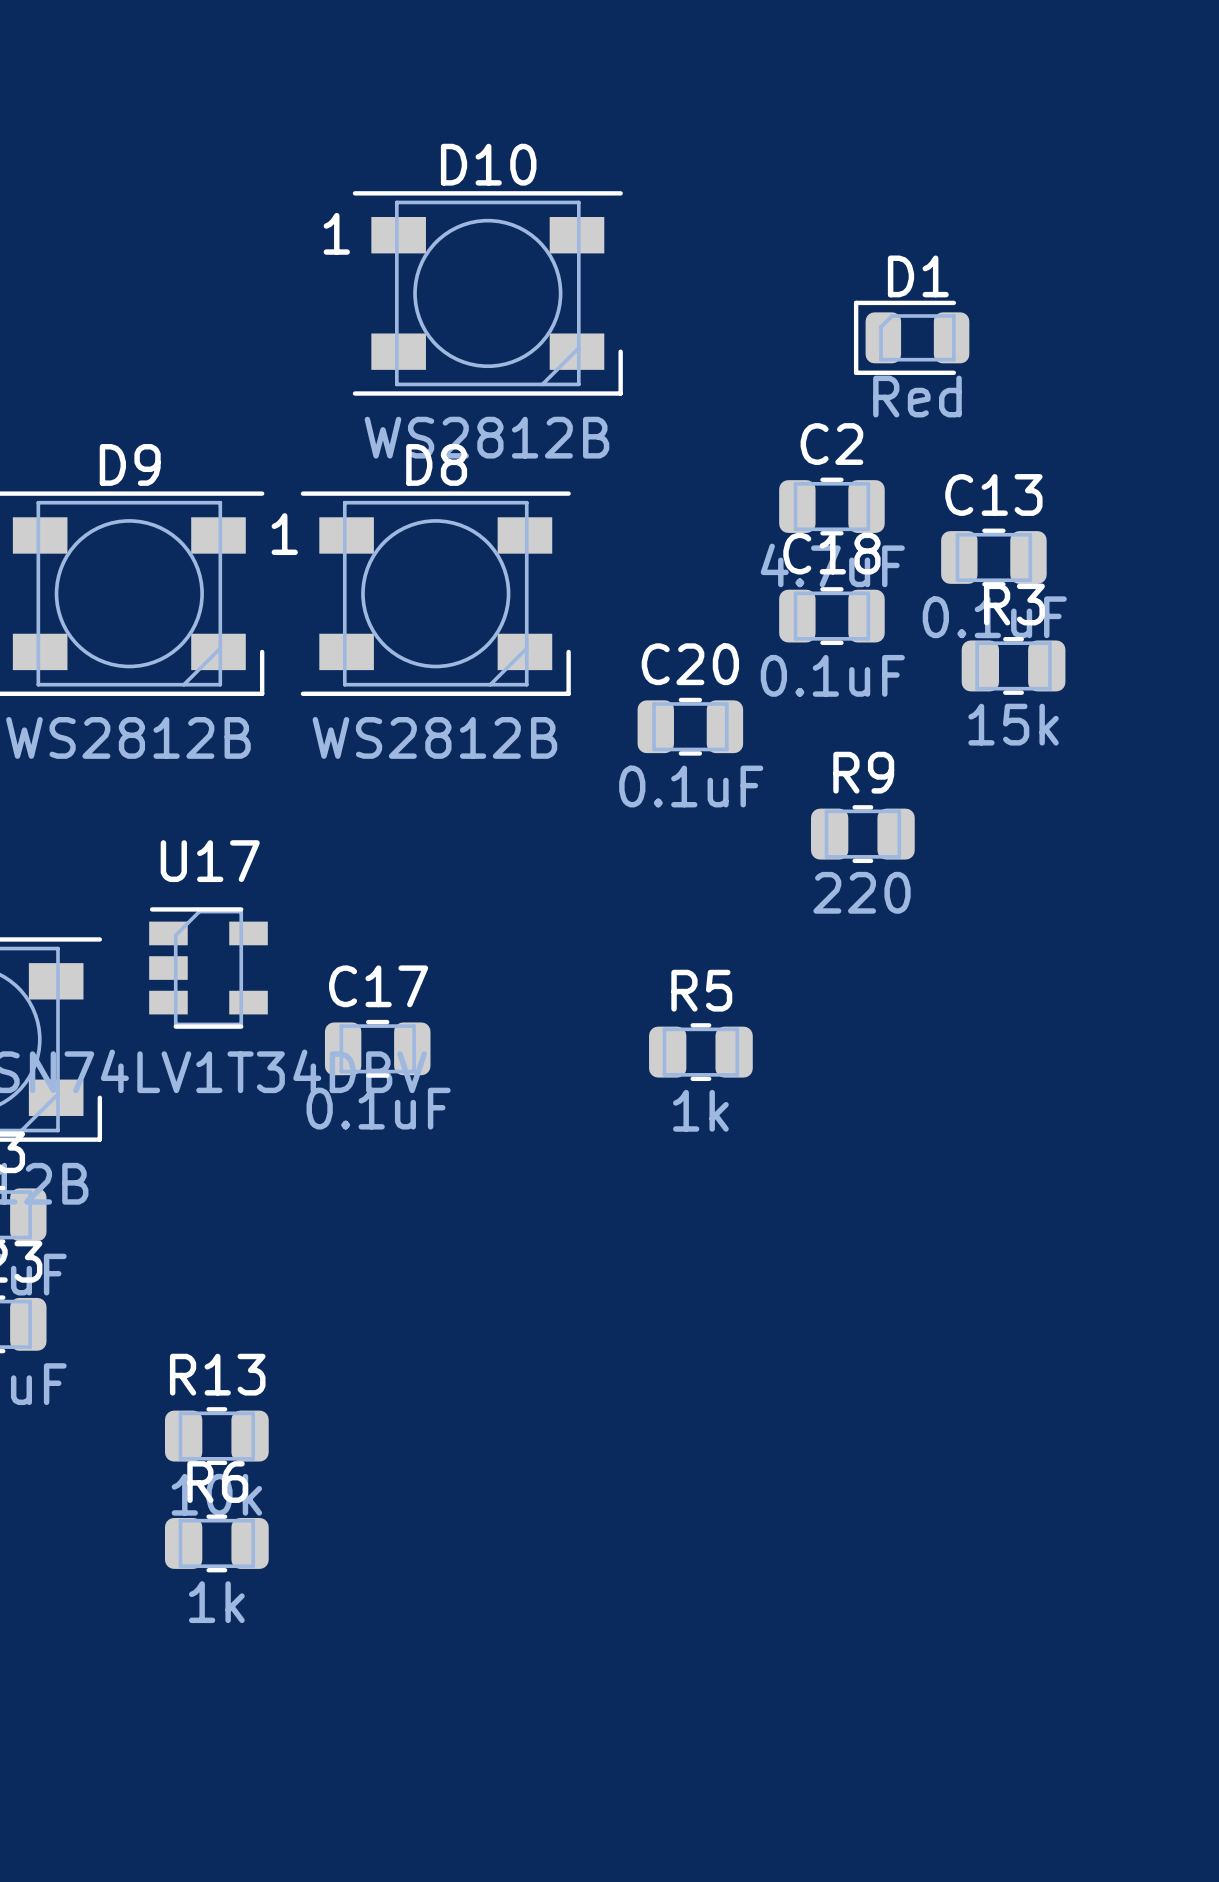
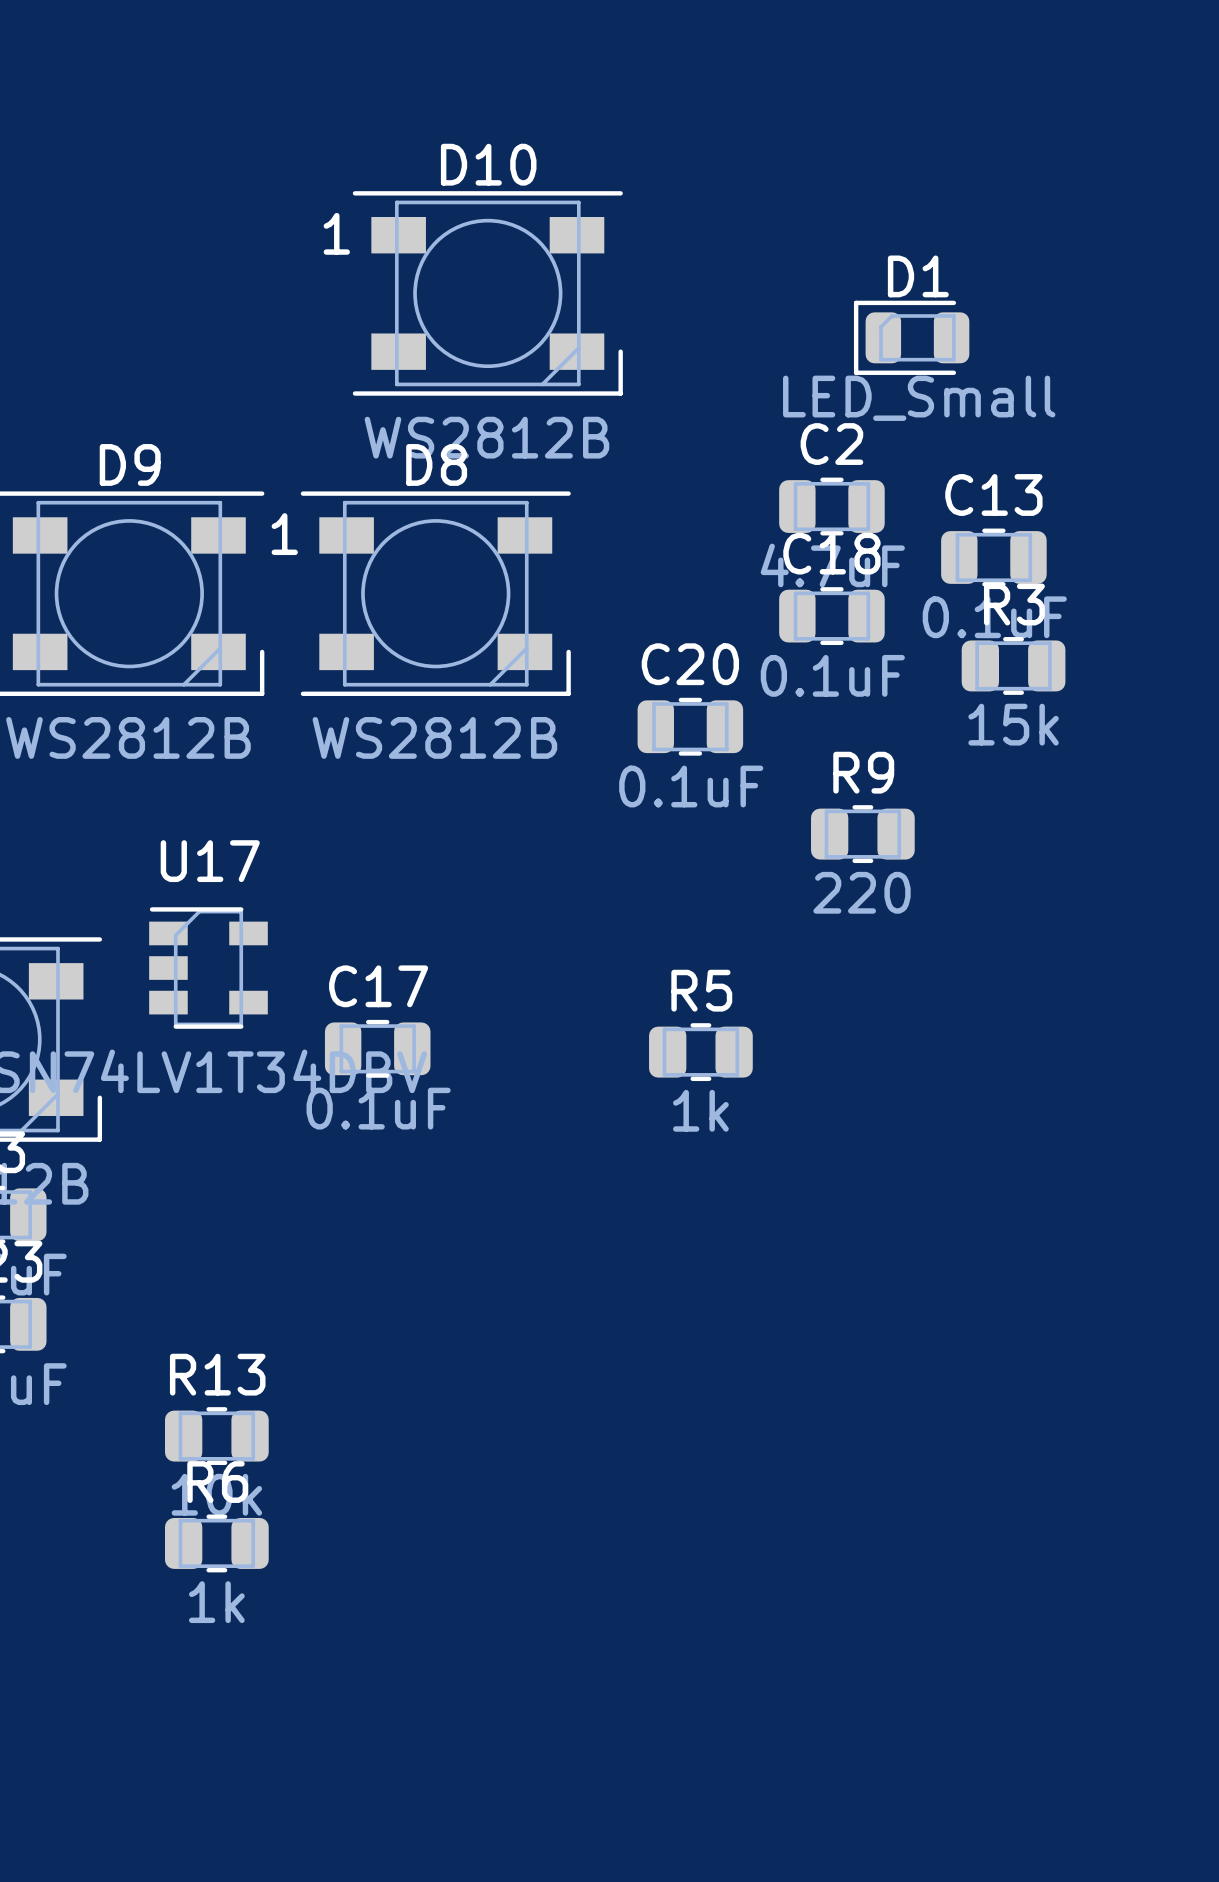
D1 value: Red (917, 396) -> LED_Small (919, 398)

